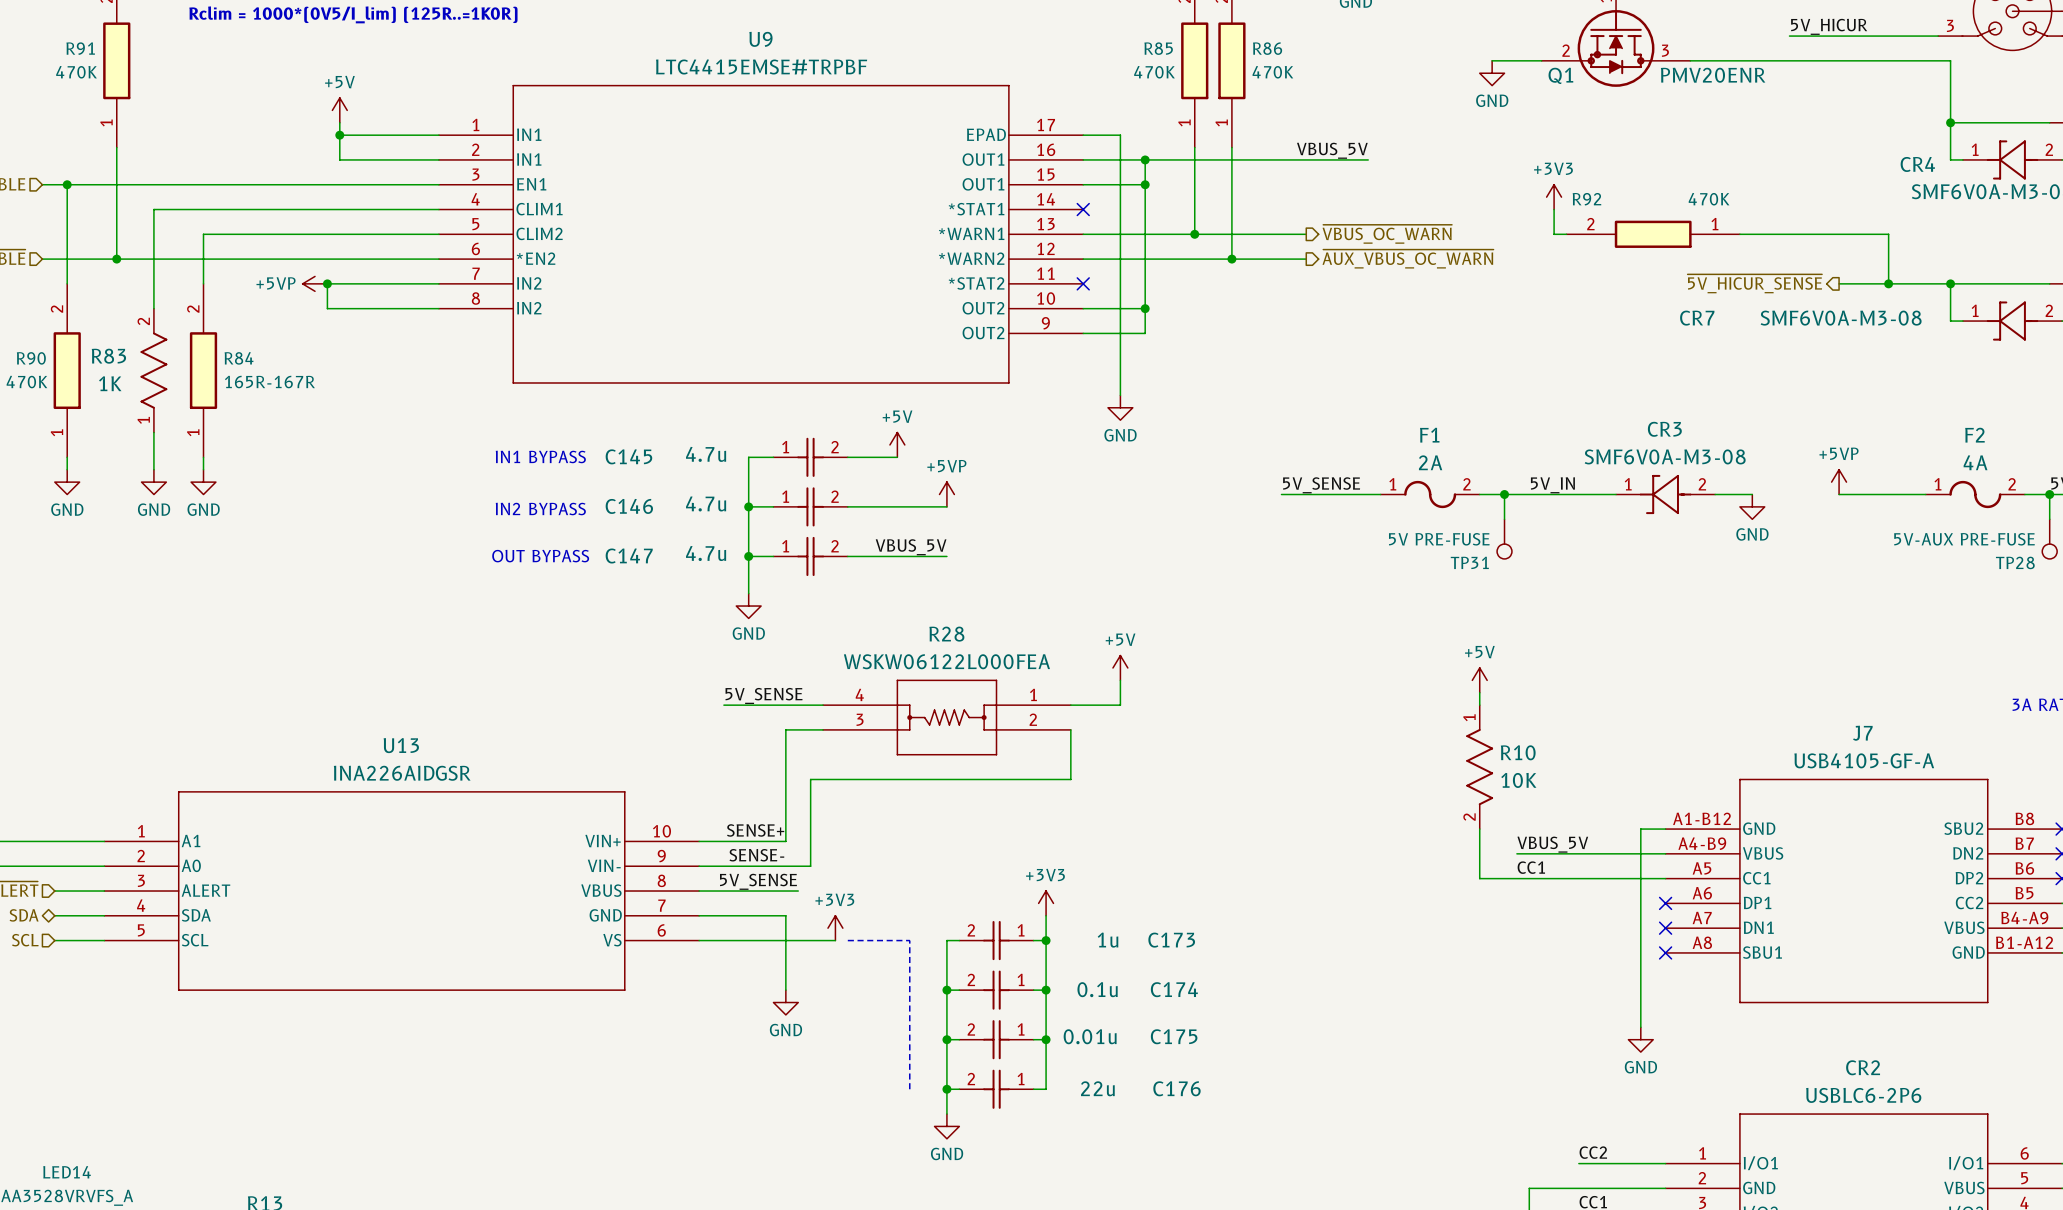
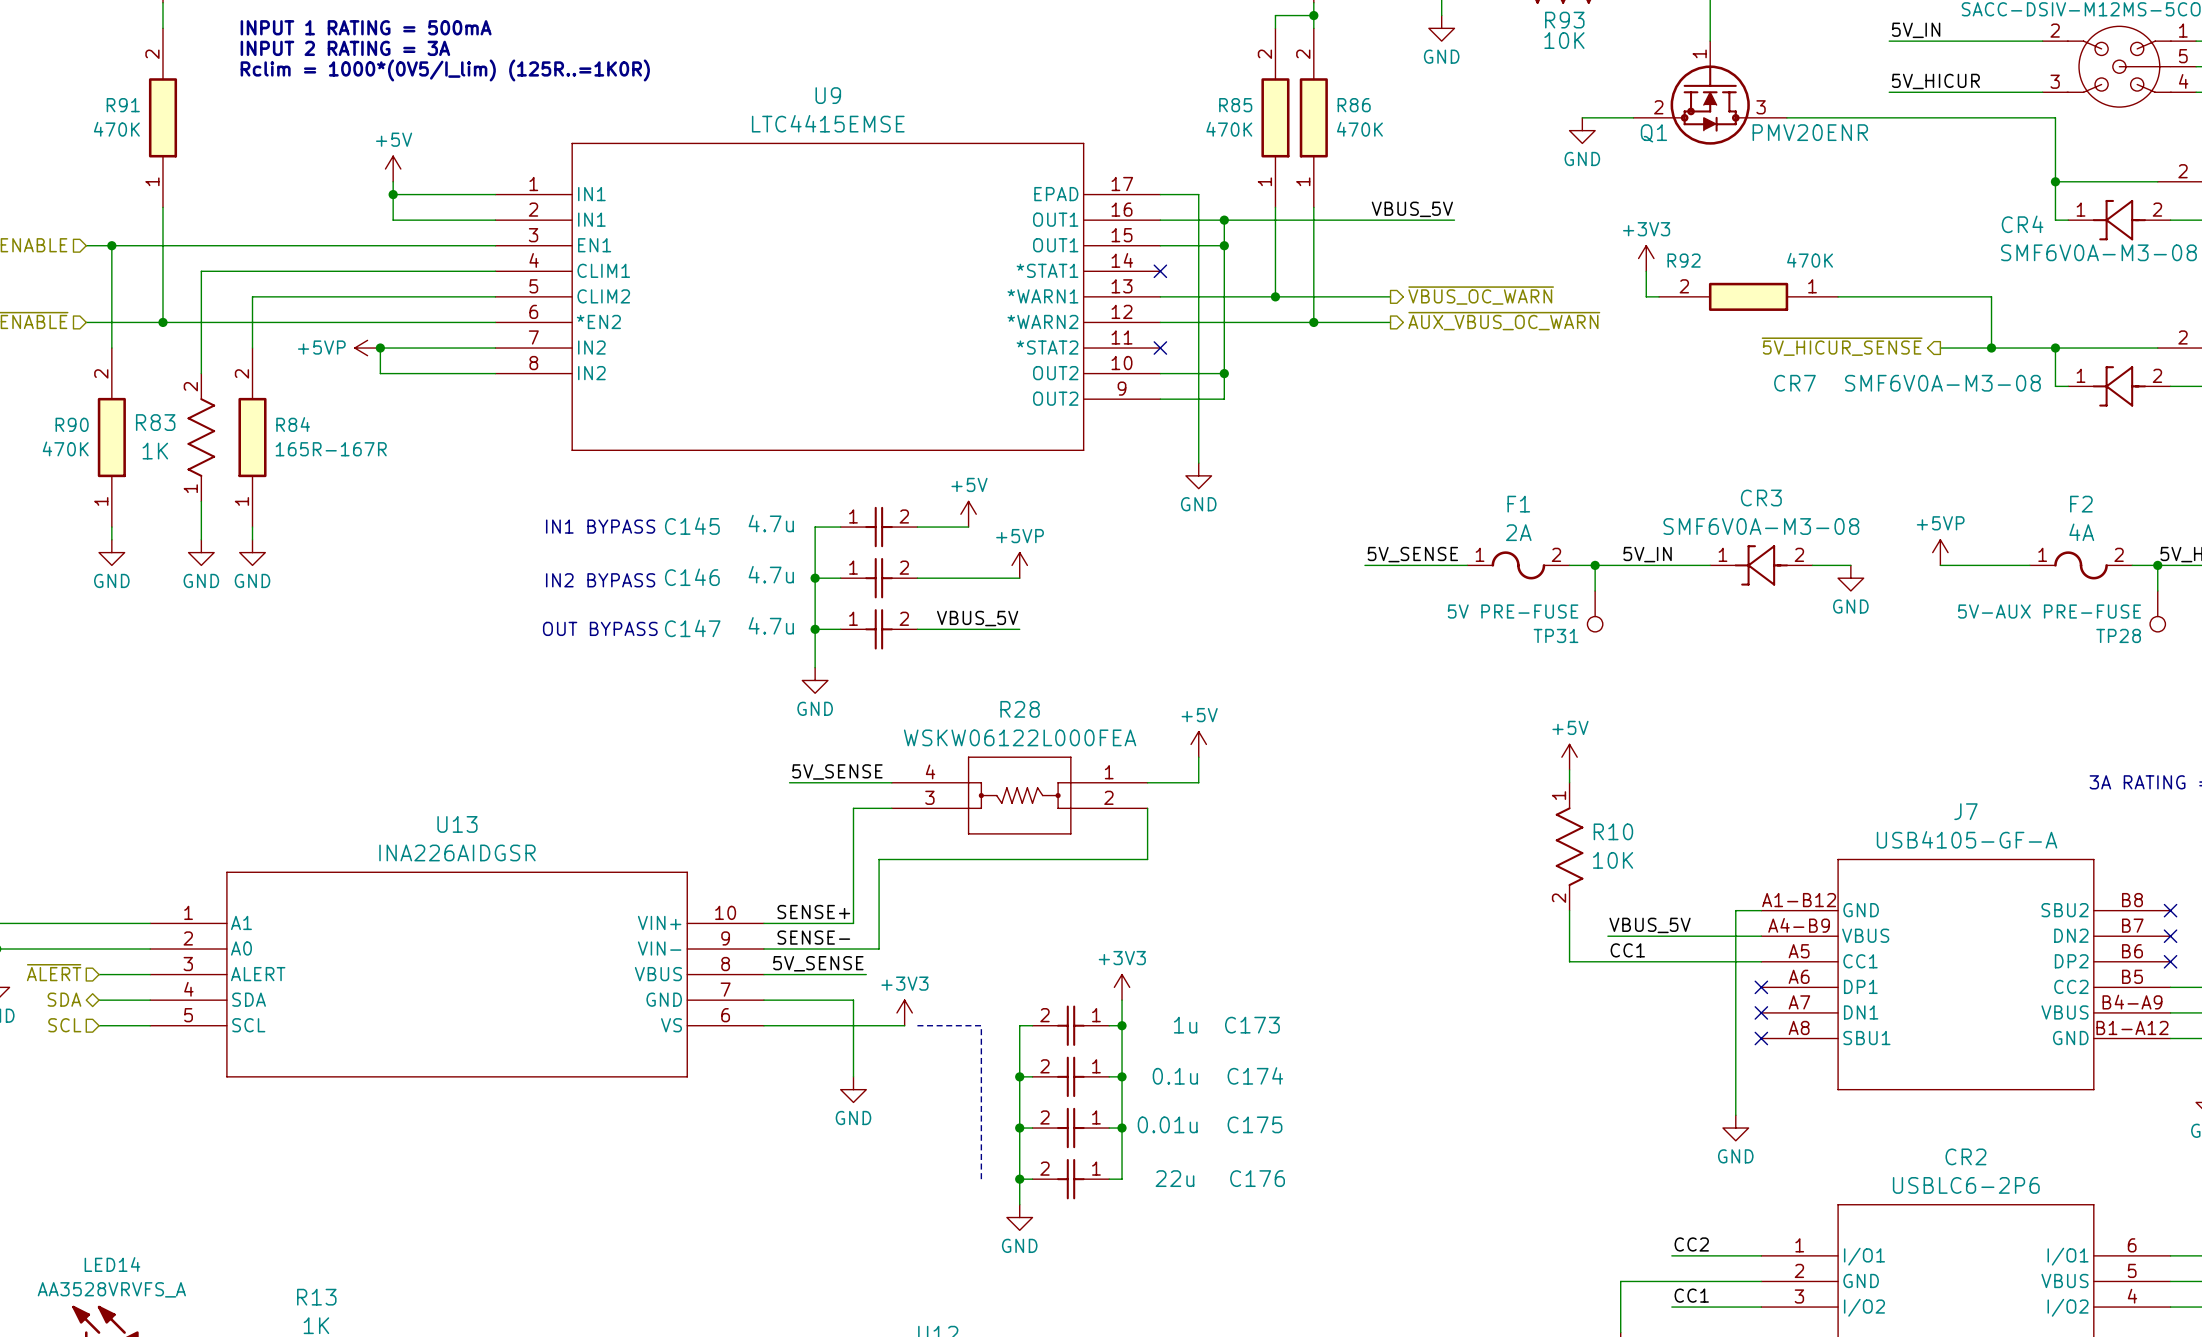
U9 value: LTC4415EMSE#TRPBF (761, 67) -> LTC4415EMSE (828, 123)

